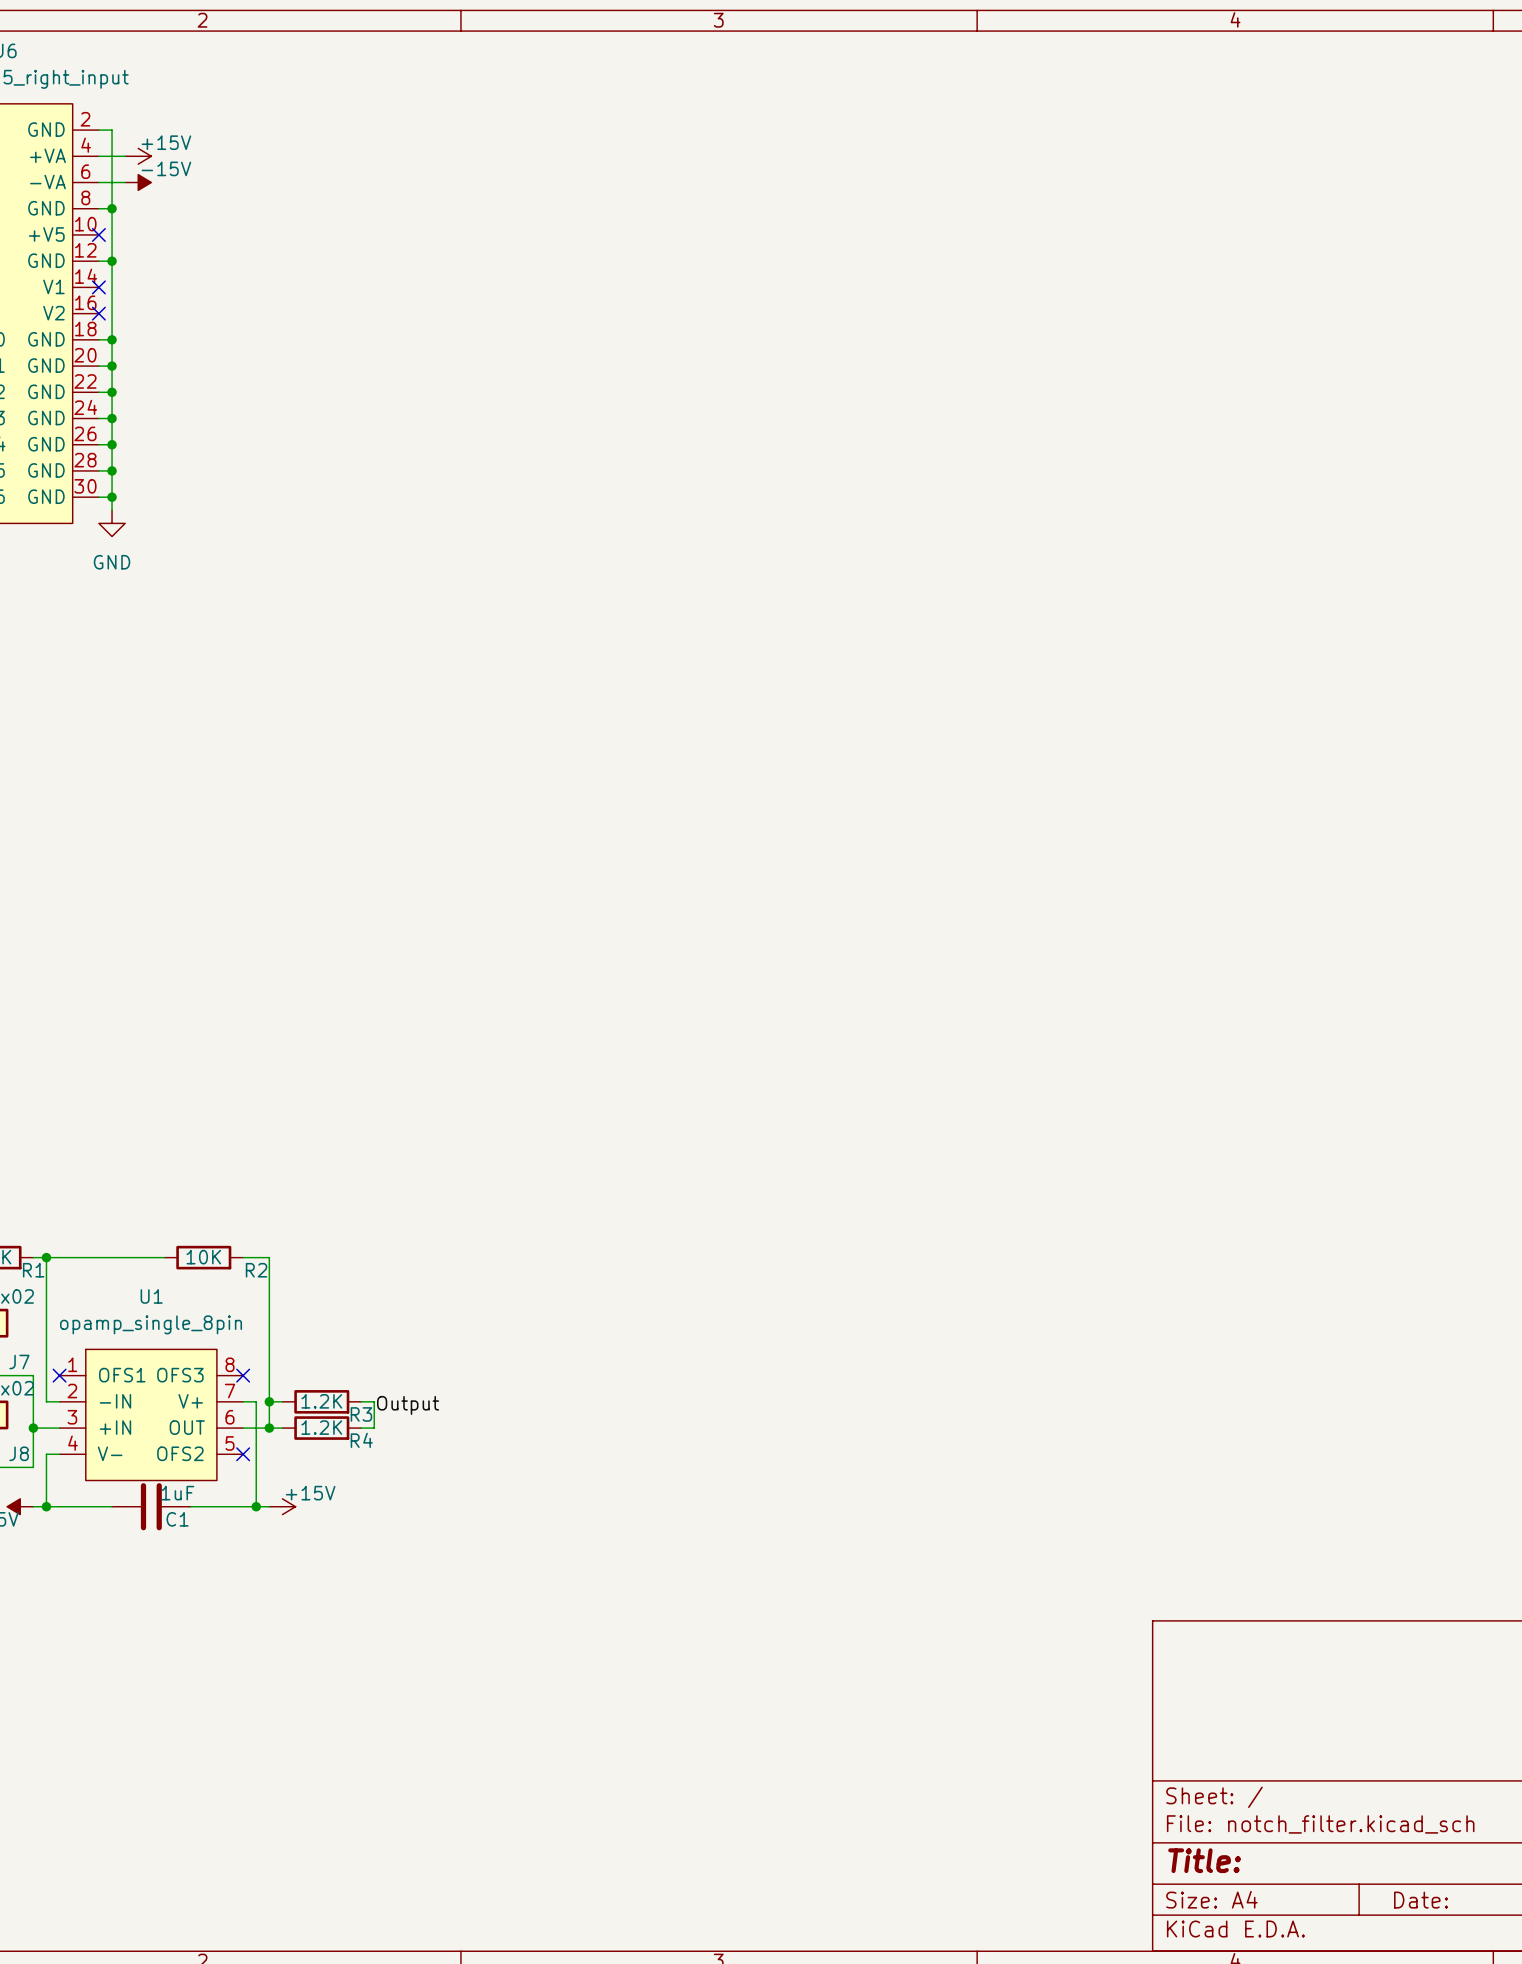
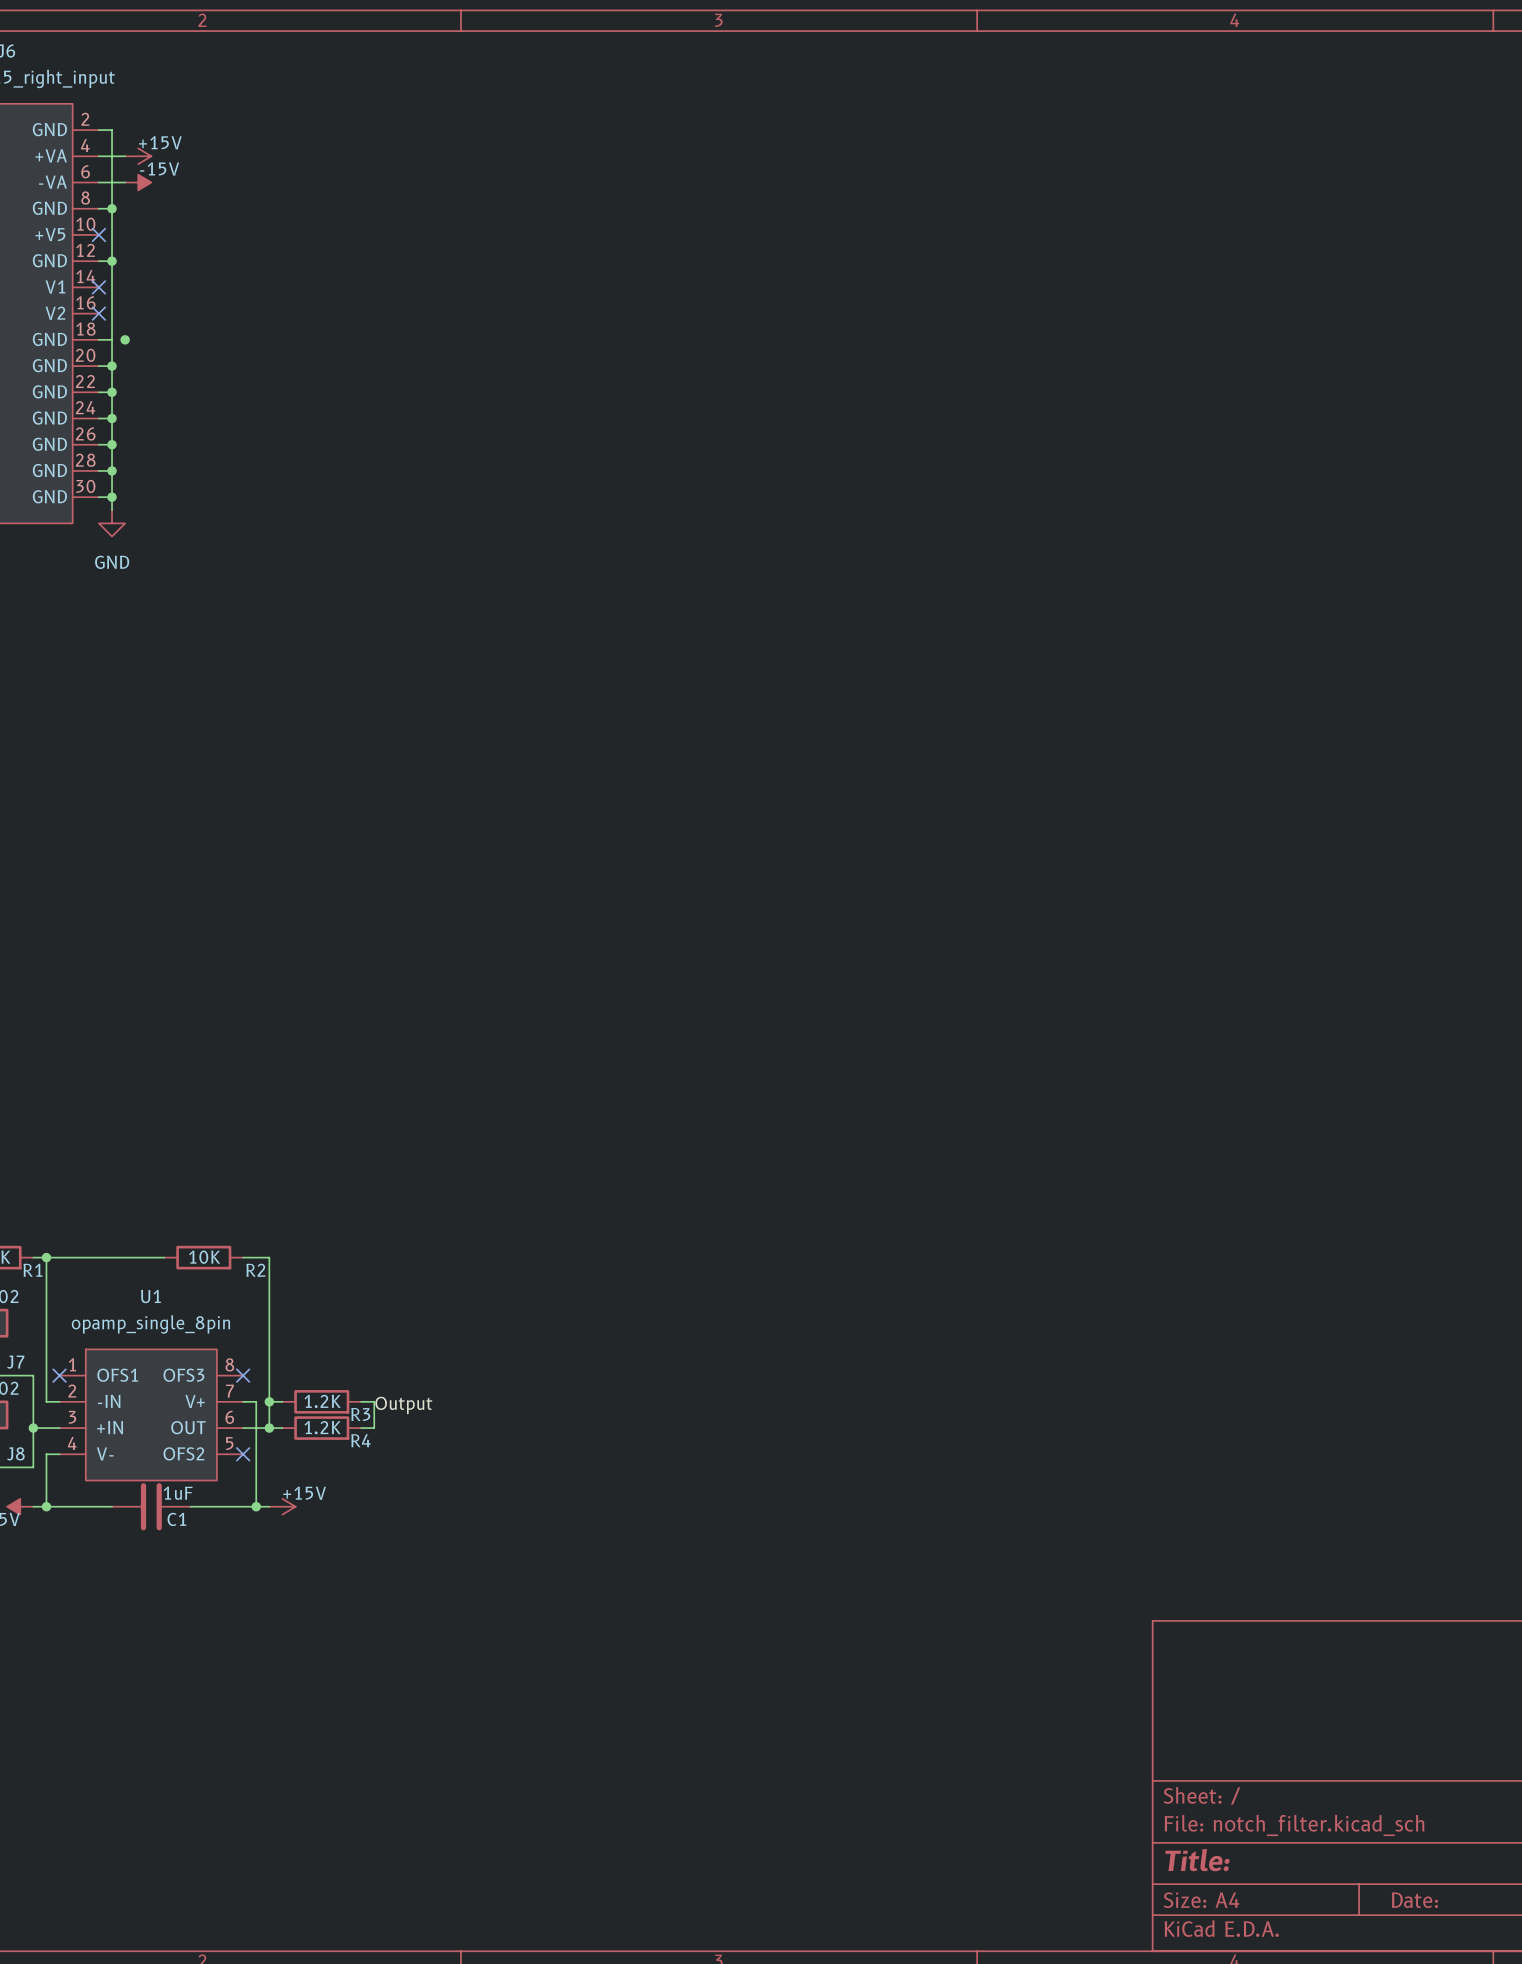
junction position: (112, 339) -> (125, 339)

